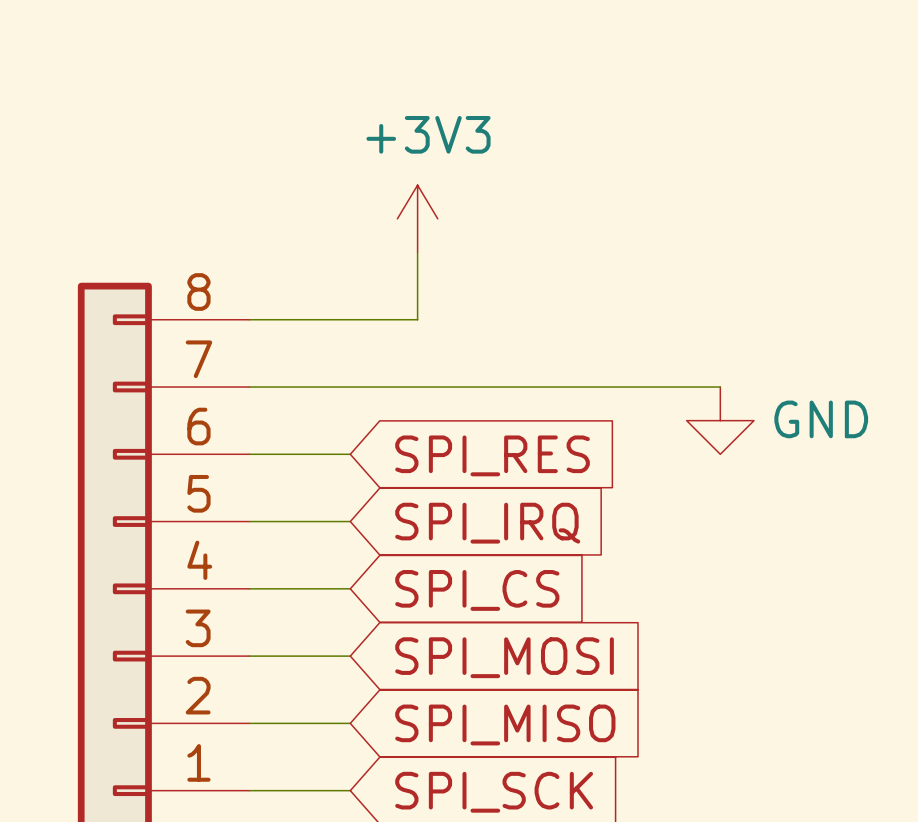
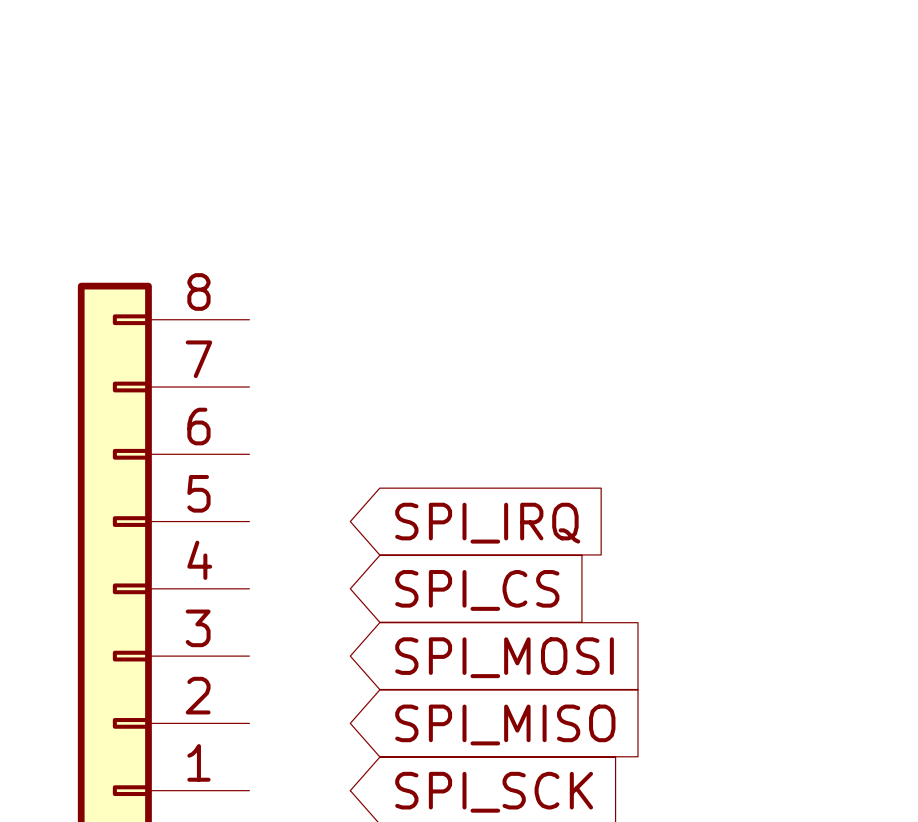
power symbol: +3V3 (417, 218) -> none
wire: (417, 252) (417, 319) (249, 319) -> none
wire: (249, 387) (720, 387) -> none
power symbol: GND (720, 420) -> none
wire: (249, 454) (350, 454) -> none
global label: SPI_RES (492, 455) -> none
wire: (249, 521) (350, 521) -> none
wire: (249, 588) (350, 588) -> none
wire: (249, 656) (350, 656) -> none
wire: (249, 723) (350, 723) -> none
wire: (249, 790) (350, 790) -> none

